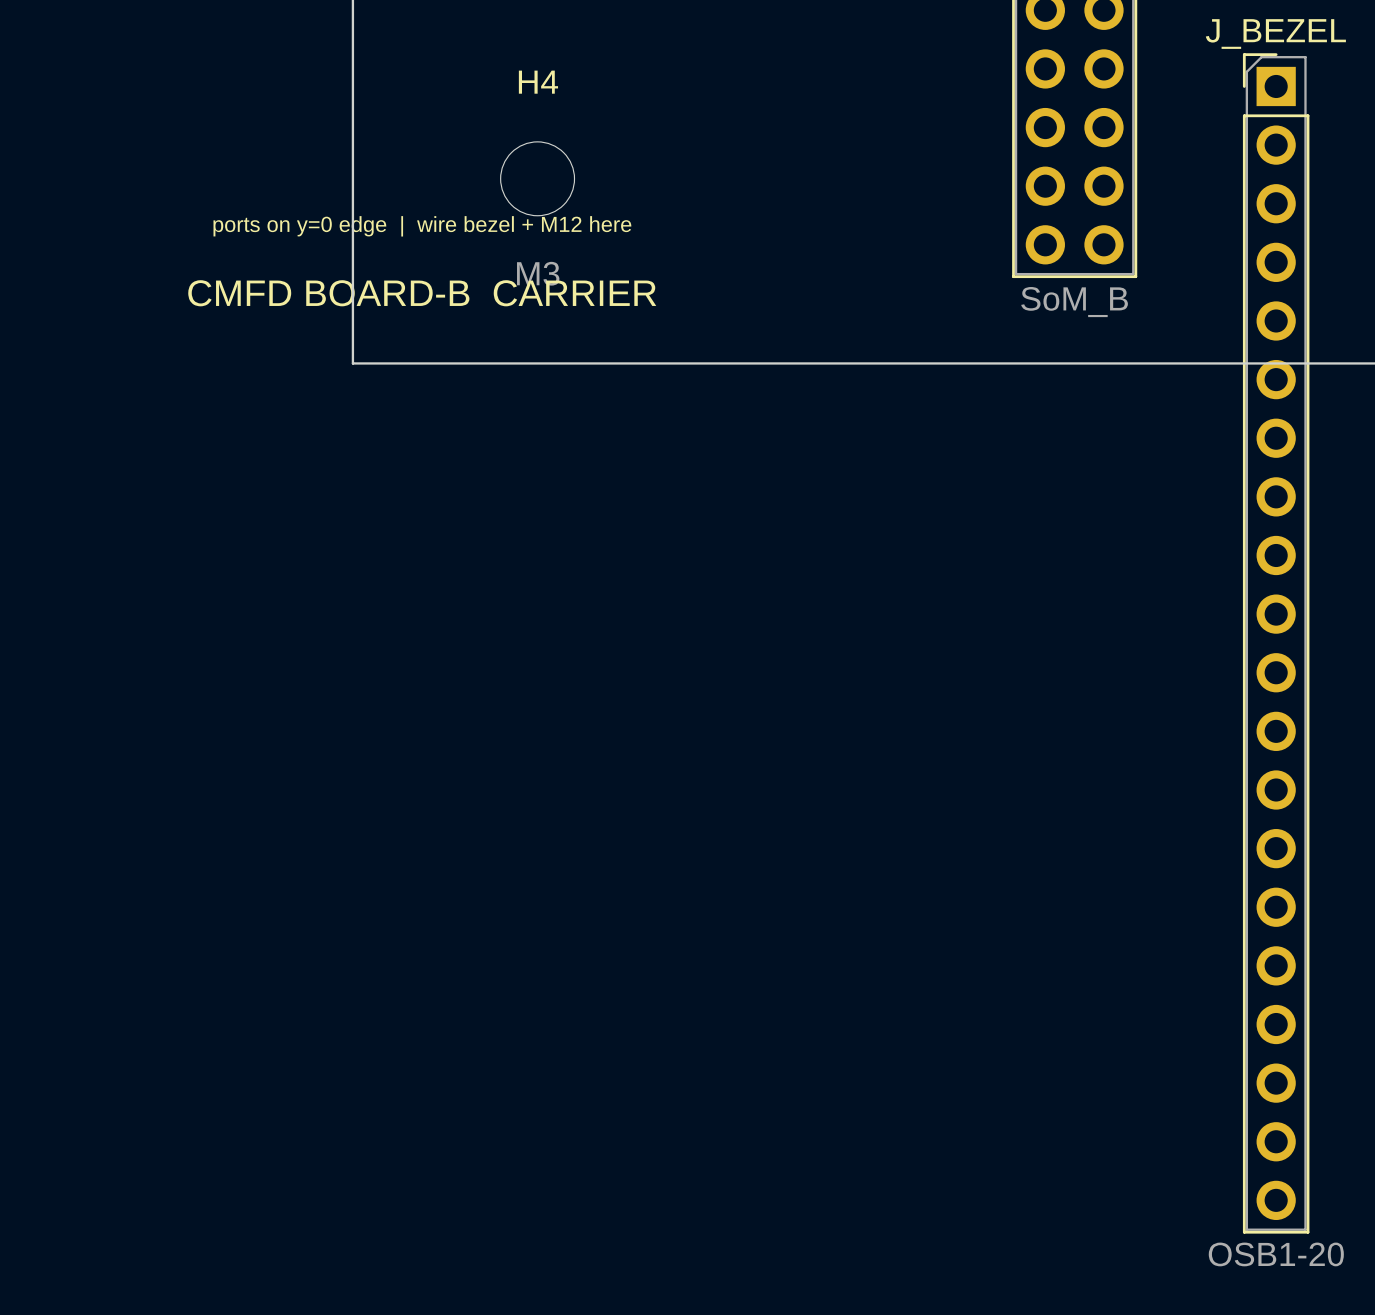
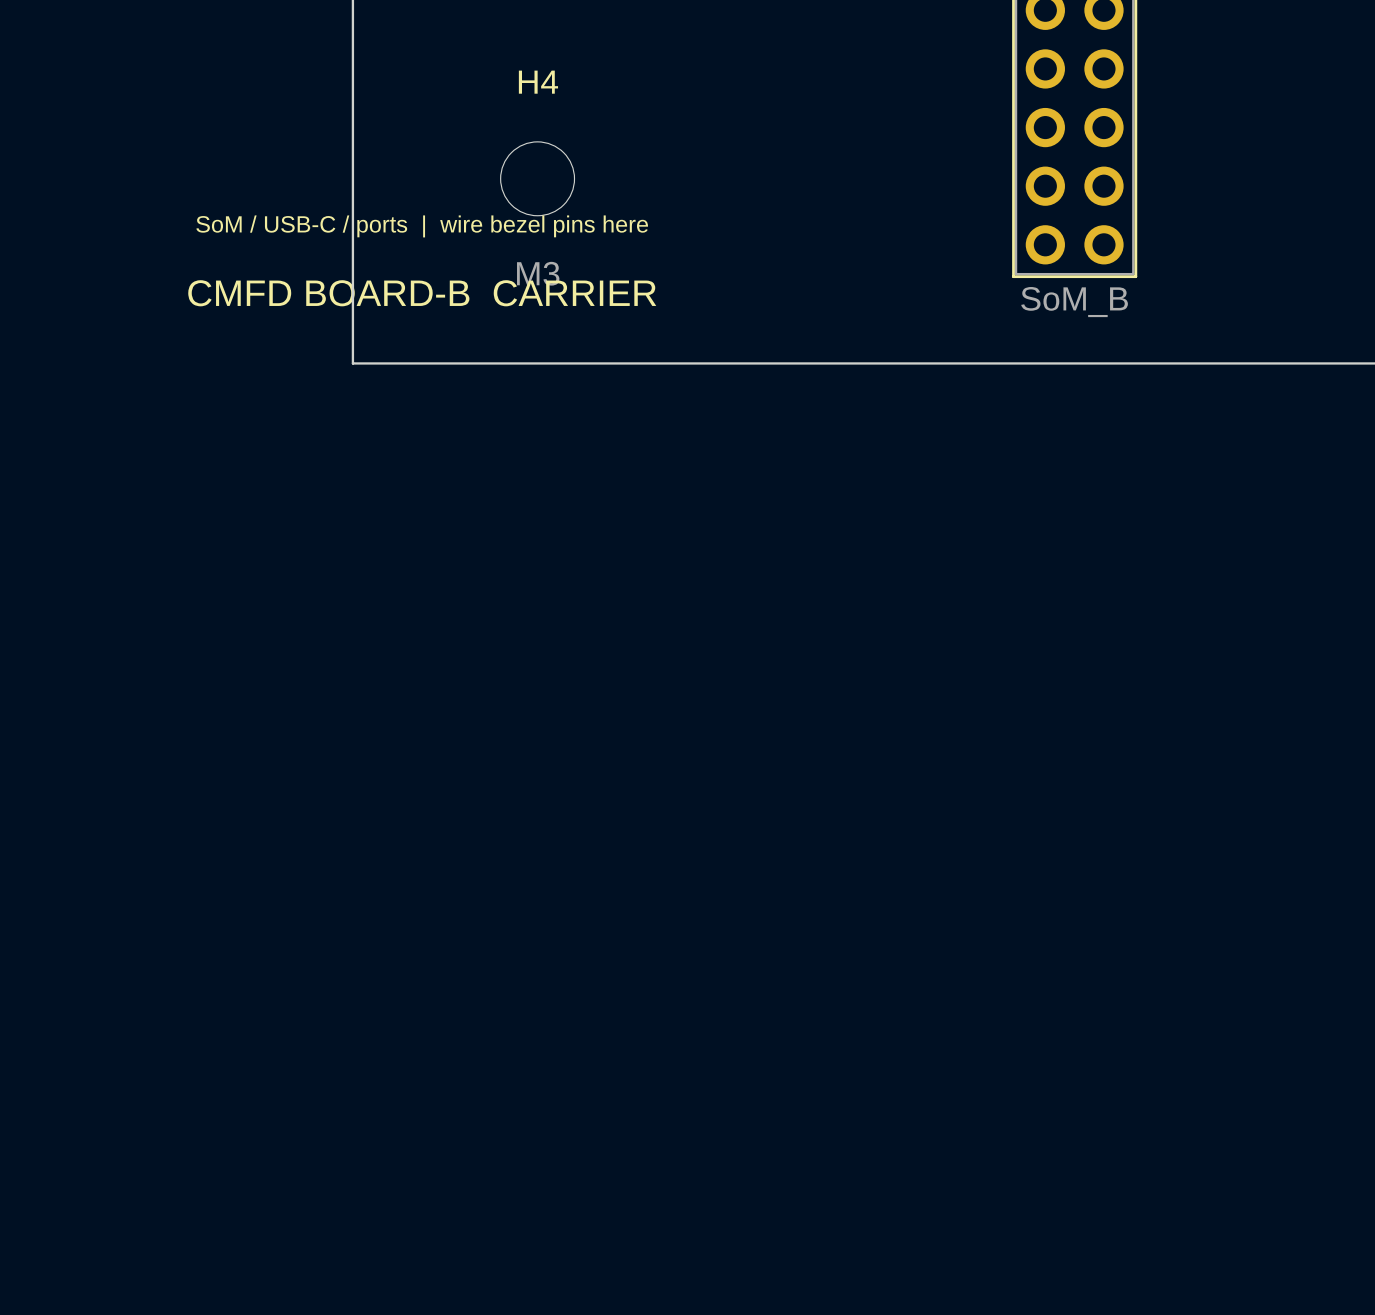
text: ports on y=0 edge | wire bezel + M12 here (422, 226) -> SoM / USB-C / ports | wire bezel pins here (422, 226)
J_BEZEL: OSB1-20 (1276, 643) -> none

